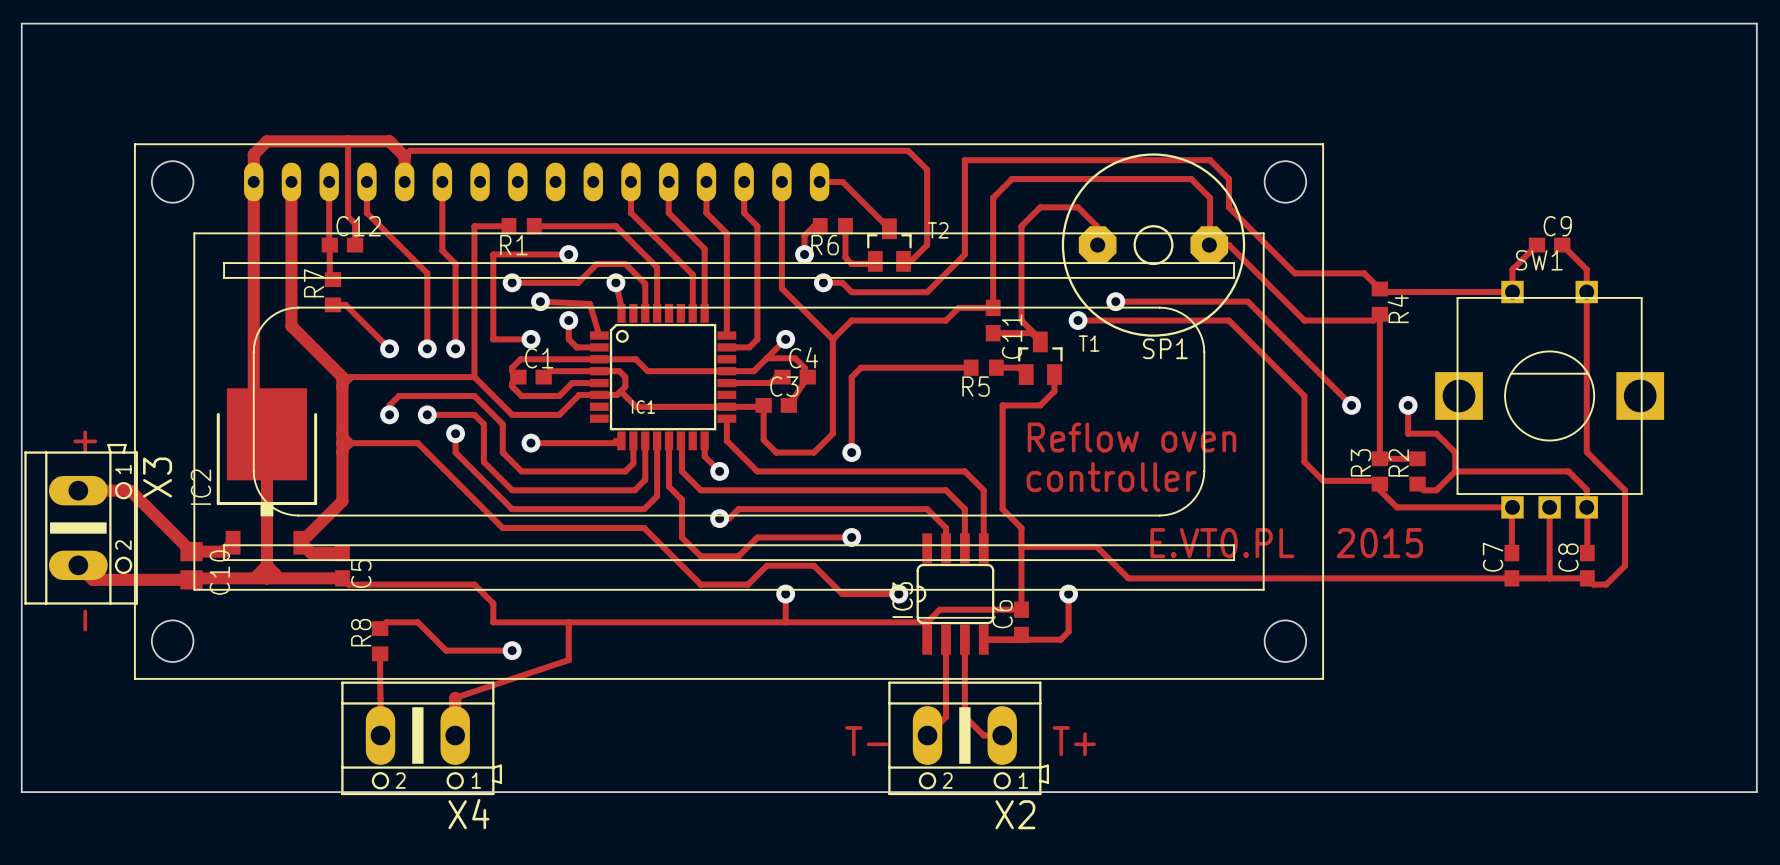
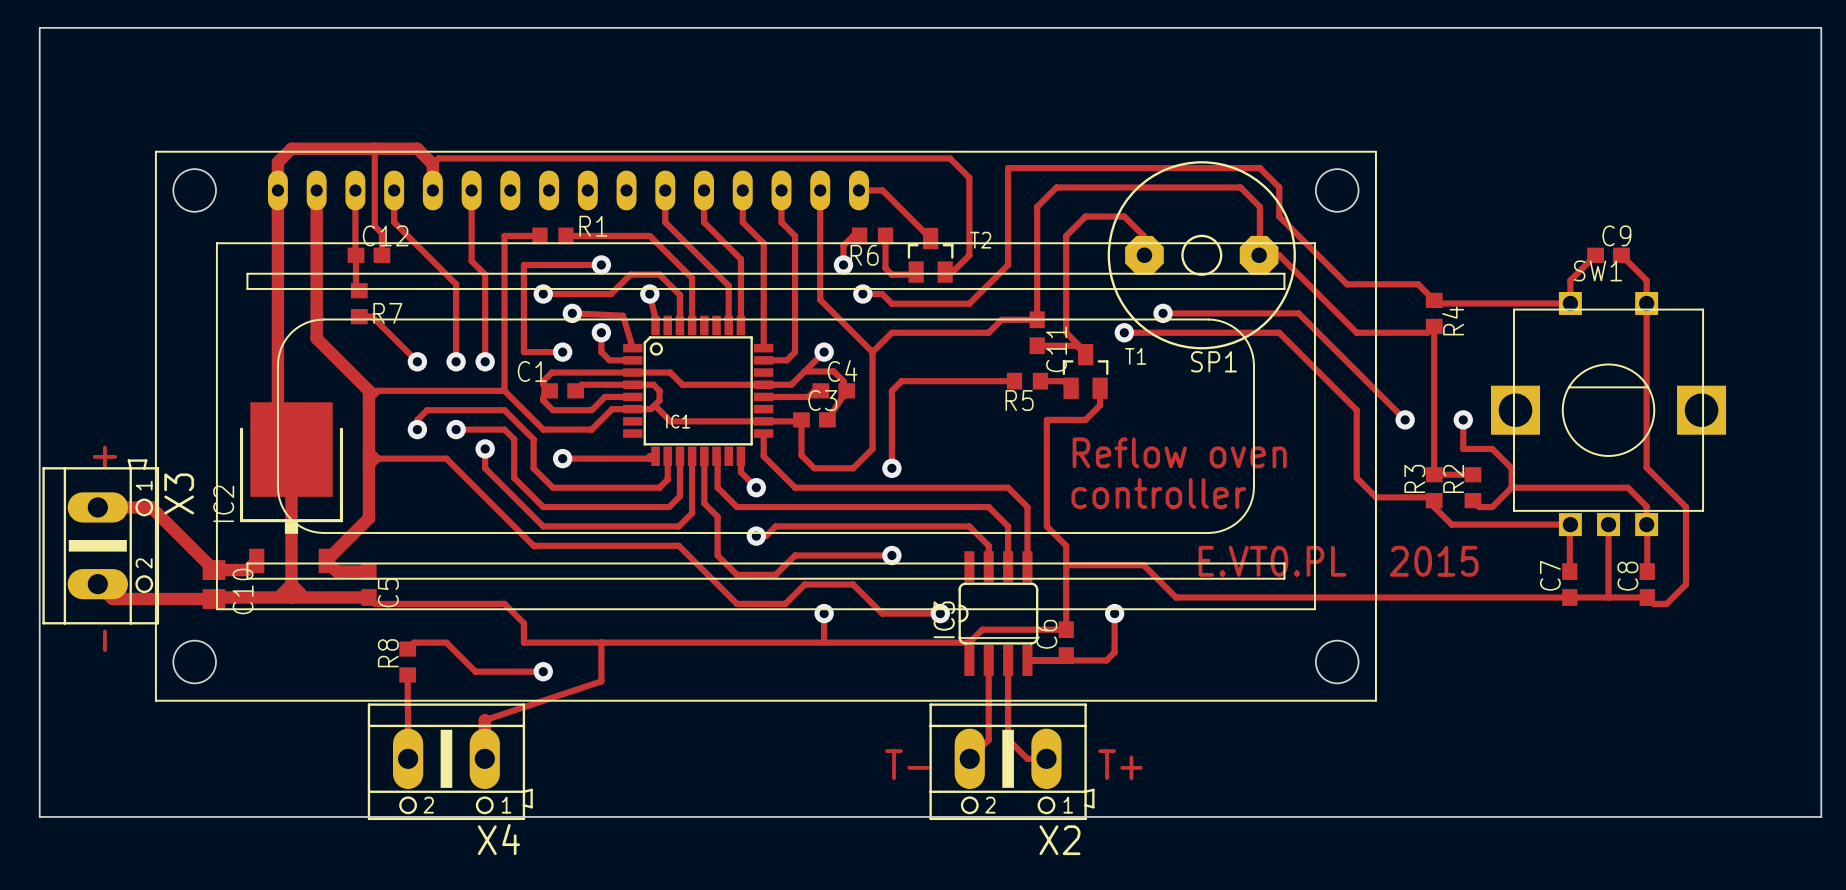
R1 name position: R1 (513, 245) -> R1 (593, 226)
R7 name rotation: 0° (314, 283) -> 90° clockwise (387, 313)
R7 name position: R7 (314, 283) -> R7 (387, 313)
C1 name position: C1 (539, 358) -> C1 (532, 371)

